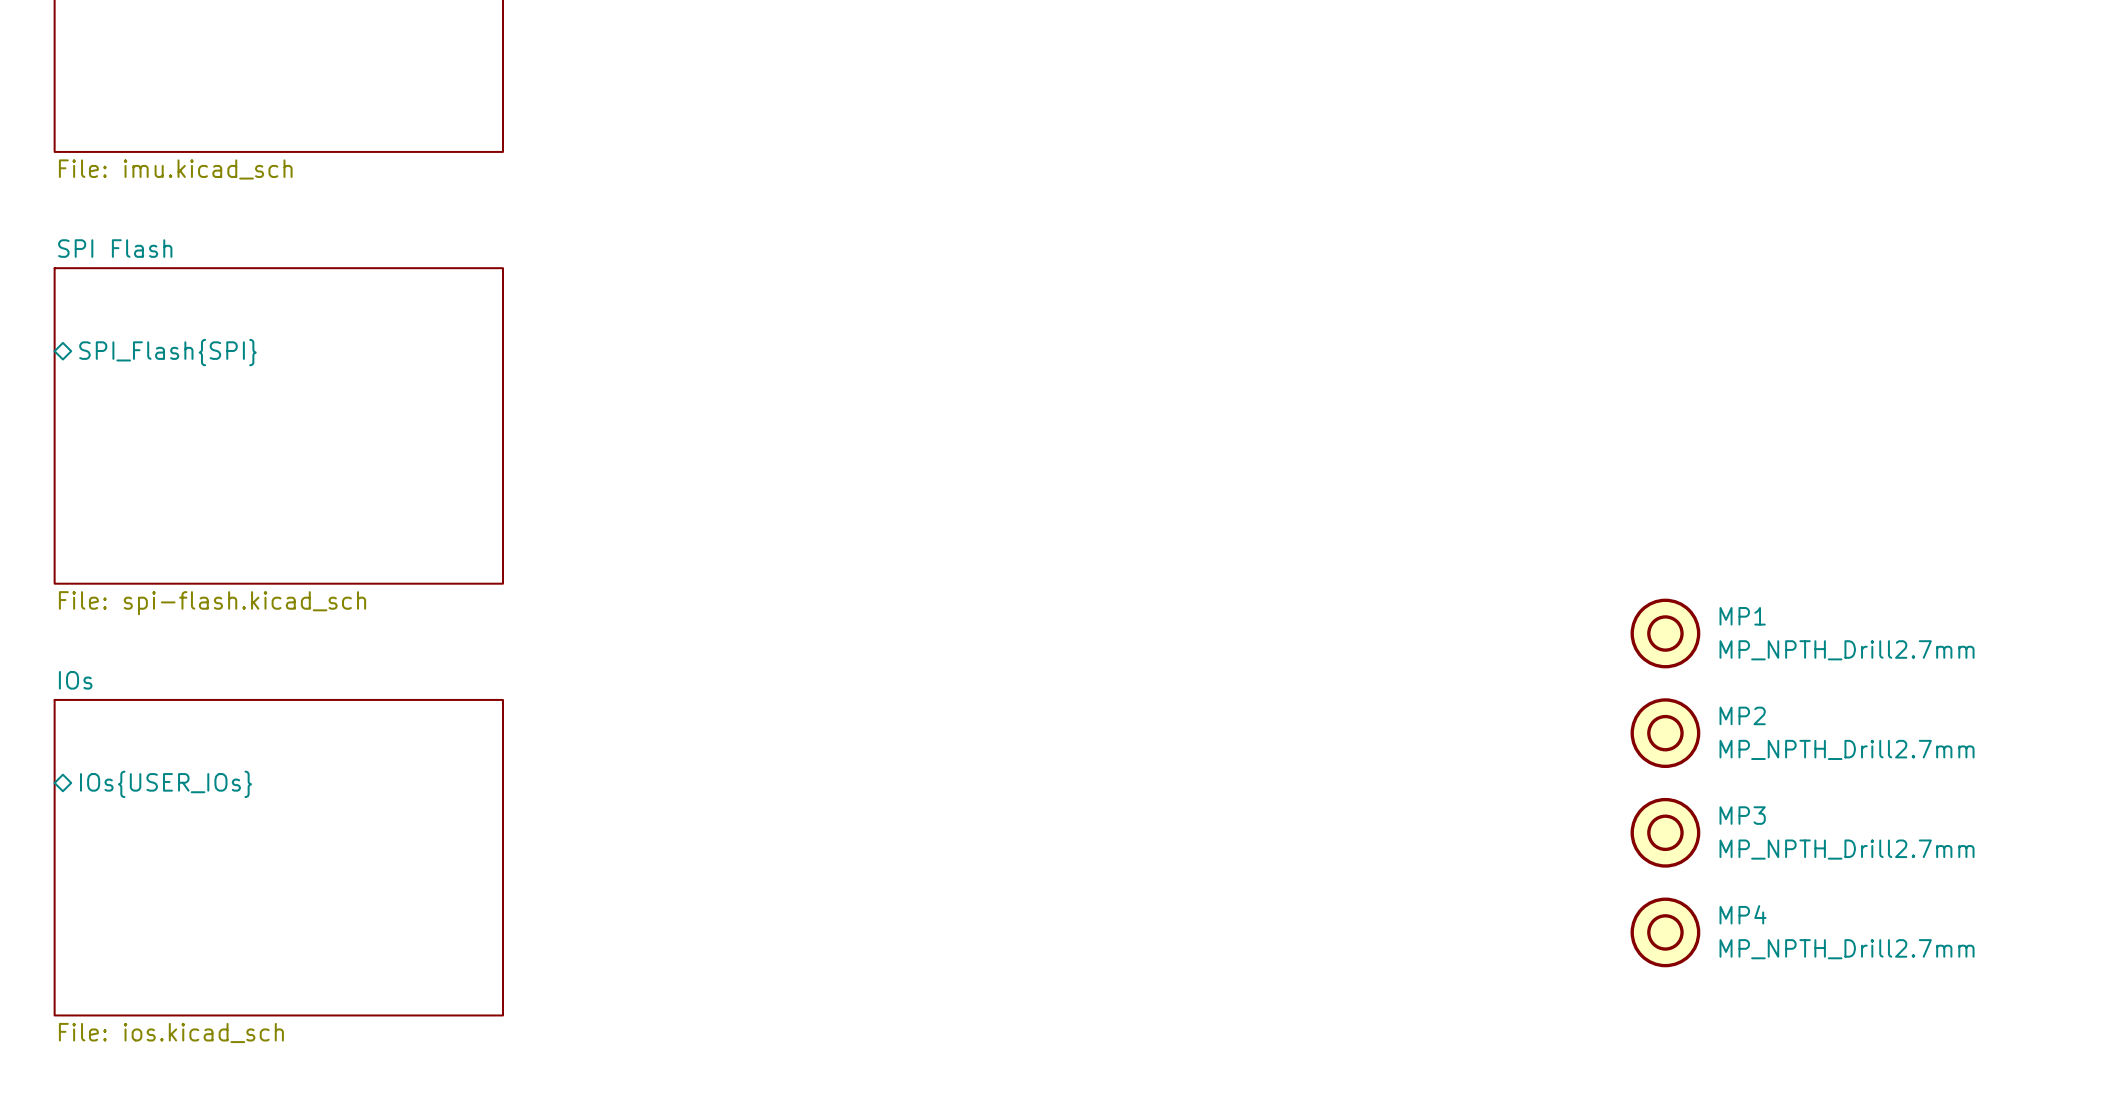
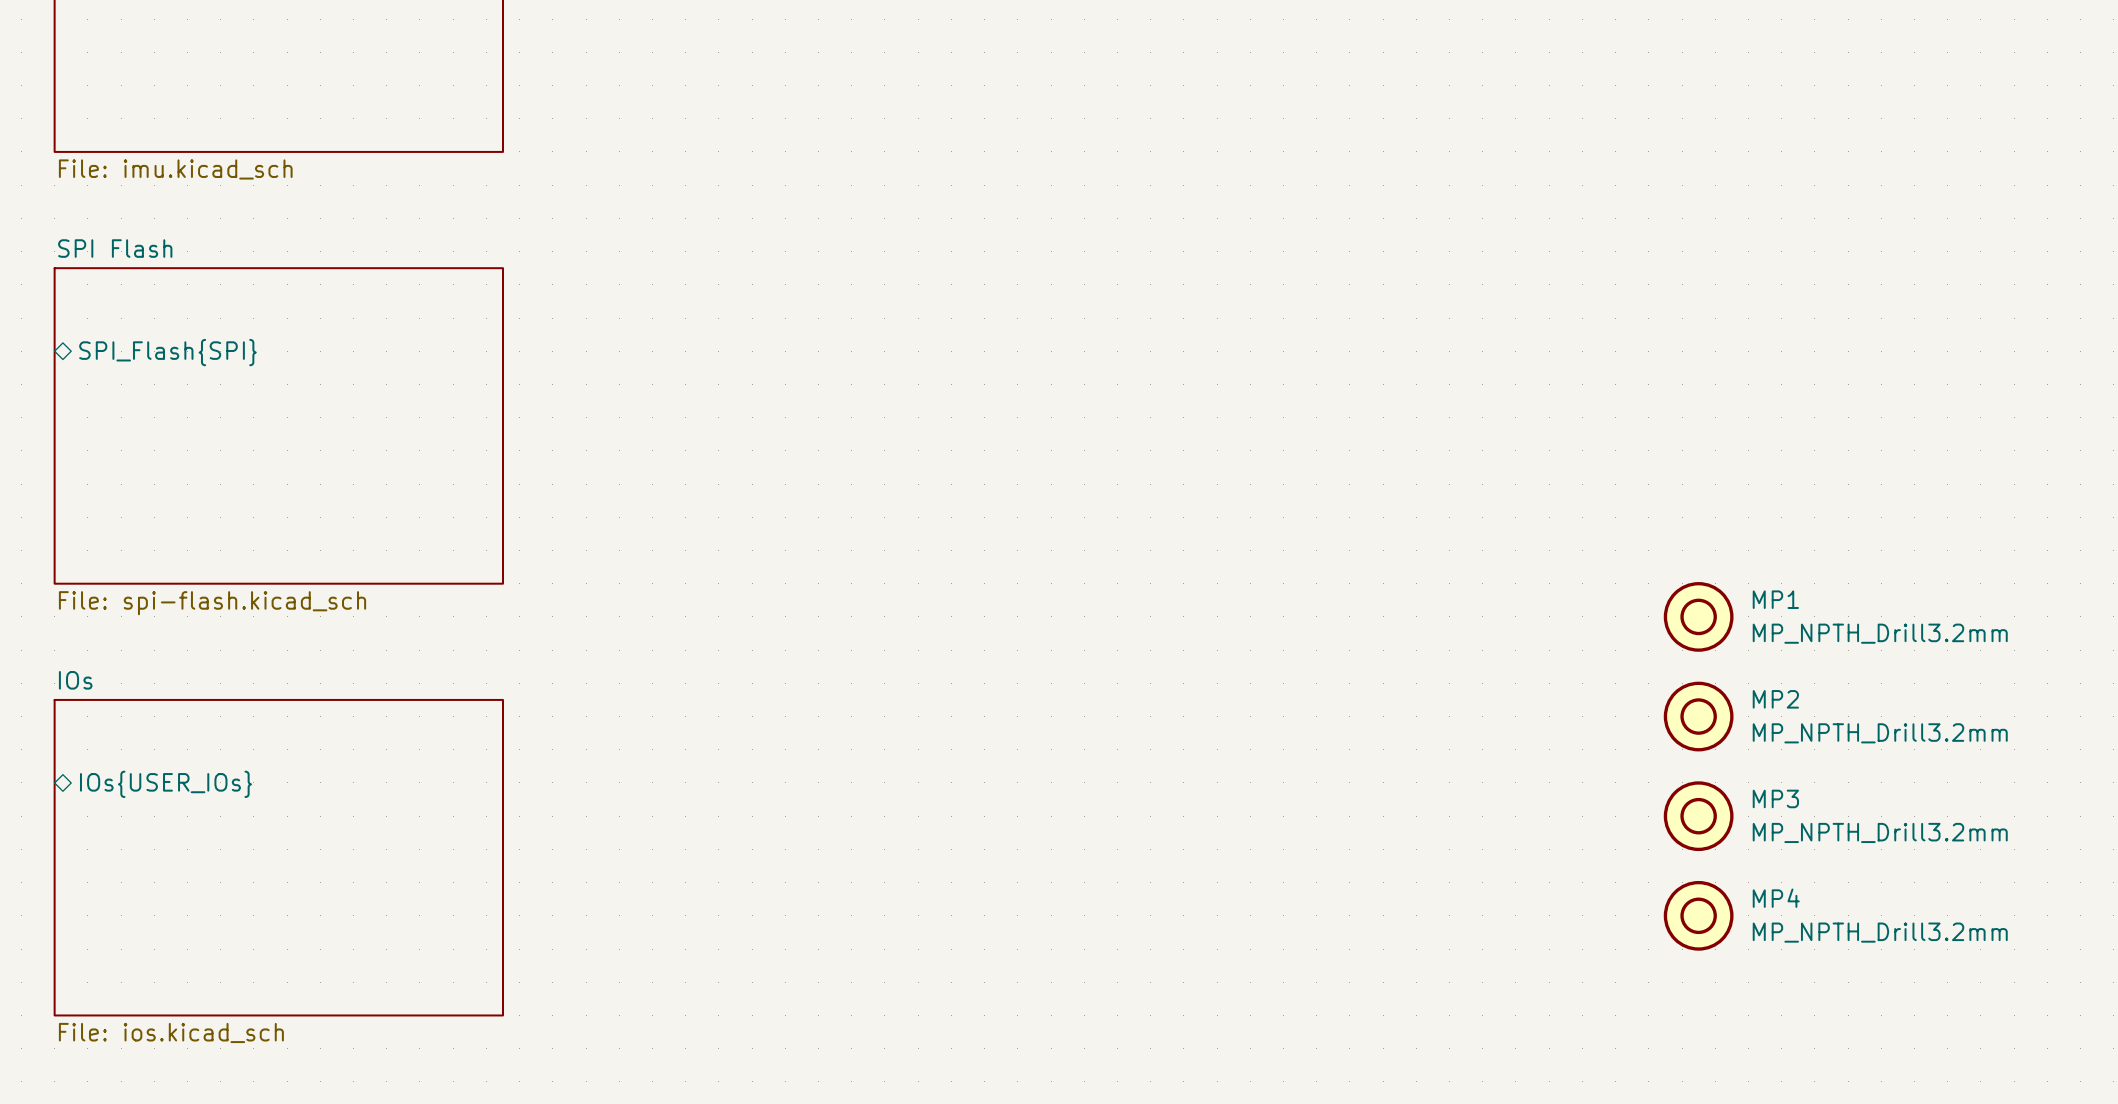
MP1 position: (1665, 633) -> (1698, 616)
MP1 value: MP_NPTH_Drill2.7mm (1847, 650) -> MP_NPTH_Drill3.2mm (1880, 633)
MP2 position: (1665, 733) -> (1698, 716)
MP2 value: MP_NPTH_Drill2.7mm (1847, 749) -> MP_NPTH_Drill3.2mm (1880, 733)
MP3 position: (1665, 832) -> (1698, 816)
MP3 value: MP_NPTH_Drill2.7mm (1847, 849) -> MP_NPTH_Drill3.2mm (1880, 832)
MP4 position: (1665, 932) -> (1698, 915)
MP4 value: MP_NPTH_Drill2.7mm (1847, 949) -> MP_NPTH_Drill3.2mm (1880, 932)

